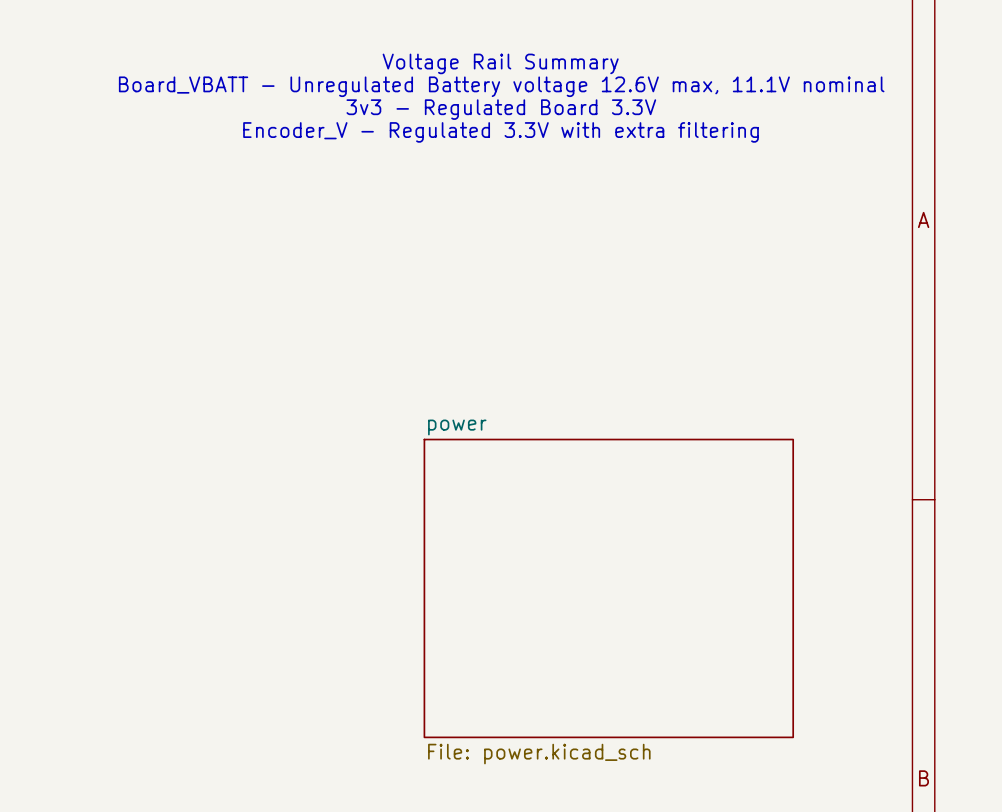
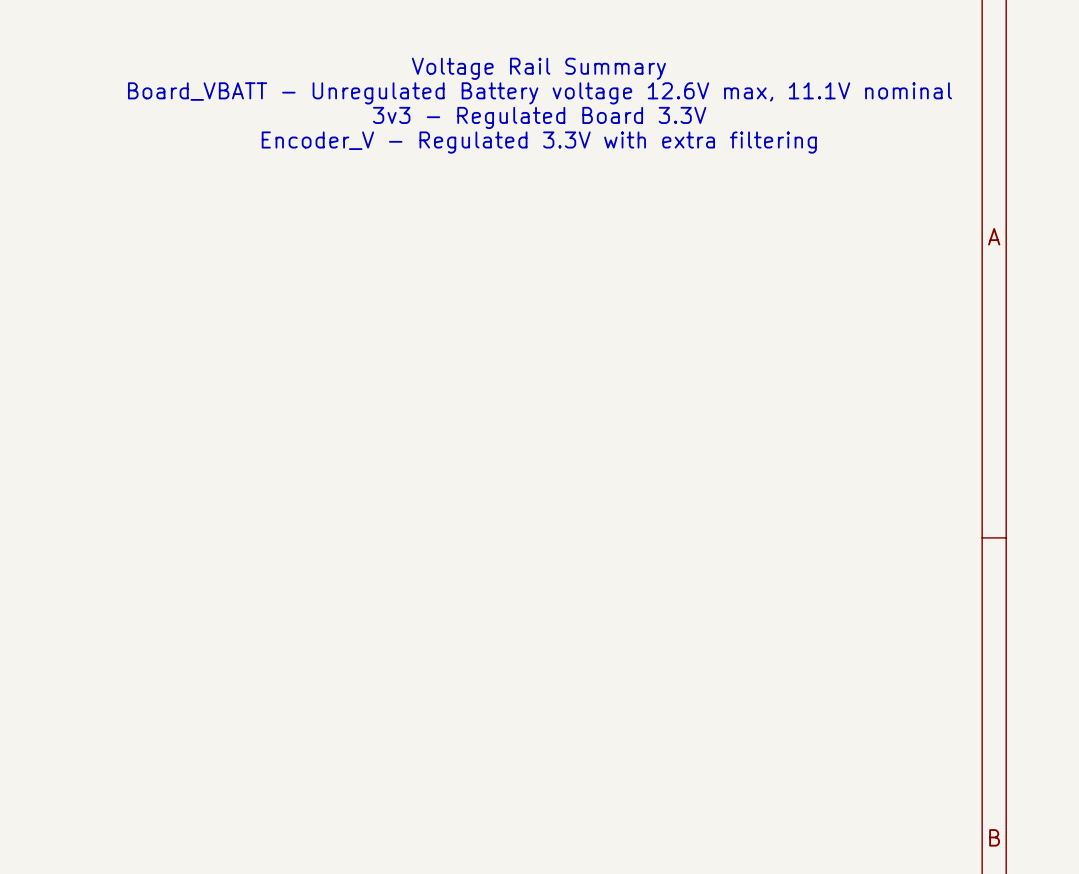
sheet power: File: power.kicad_sch (608, 588) -> none

